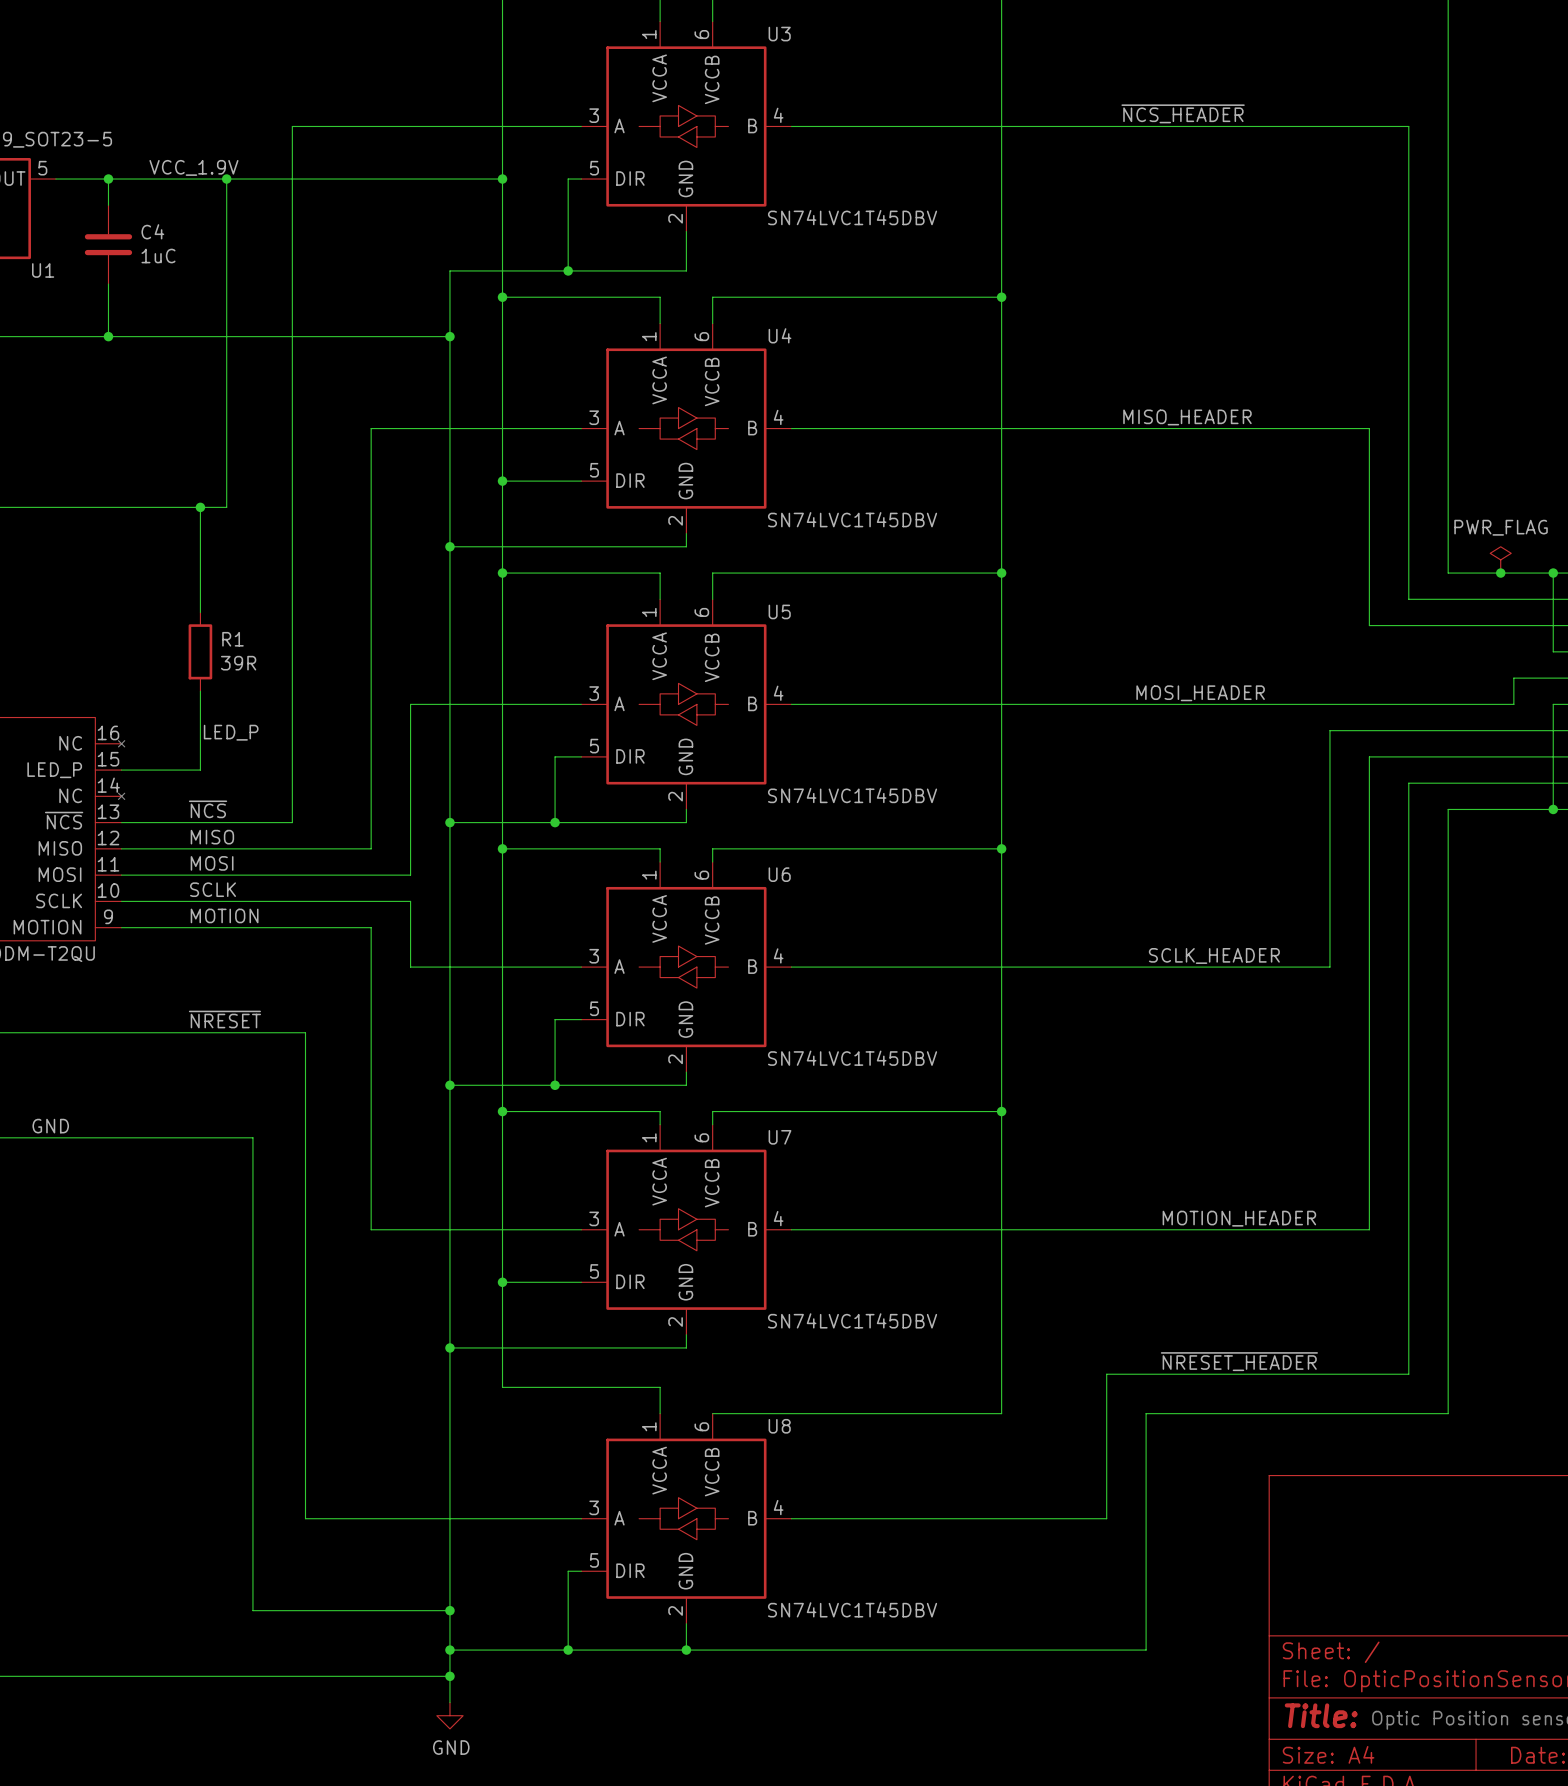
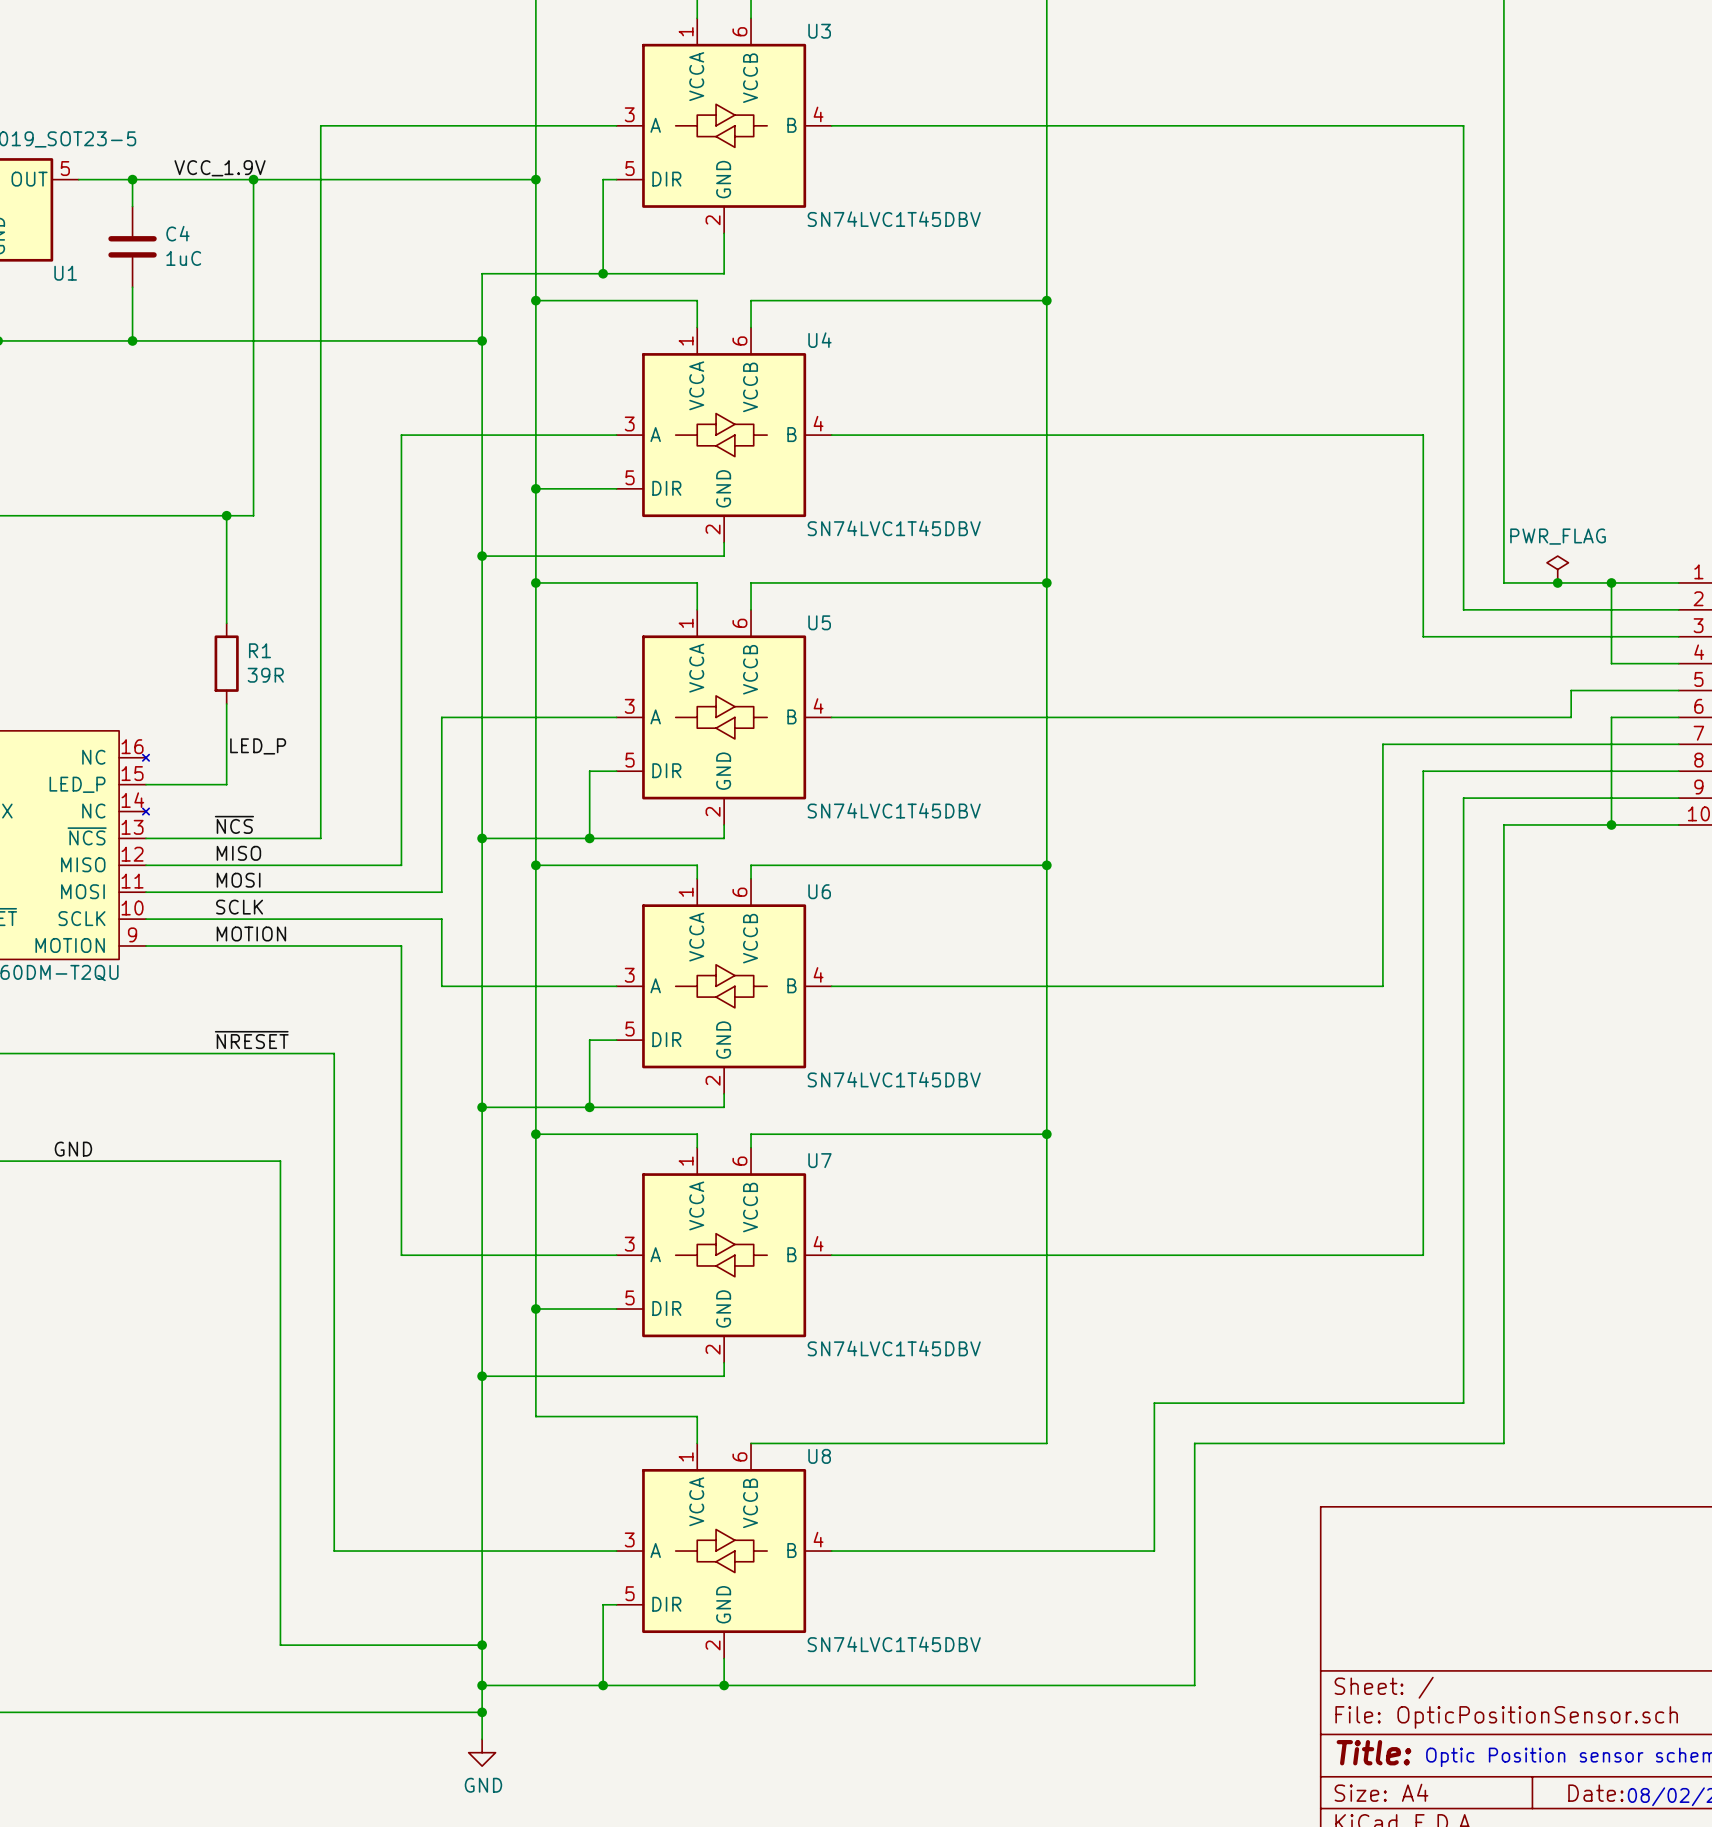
label: ~{NCS_HEADER} (1183, 113) -> none
label: MISO_HEADER (1187, 417) -> none
label: MOSI_HEADER (1200, 693) -> none
label: SCLK_HEADER (1214, 955) -> none
label: MOTION_HEADER (1239, 1218) -> none
label: ~{NRESET_HEADER} (1239, 1361) -> none

